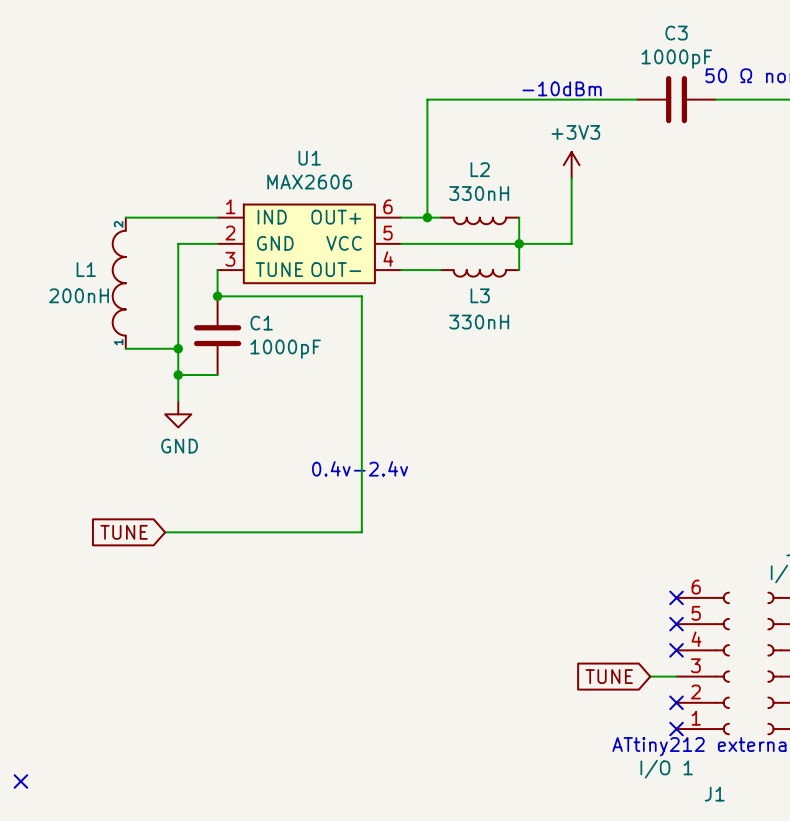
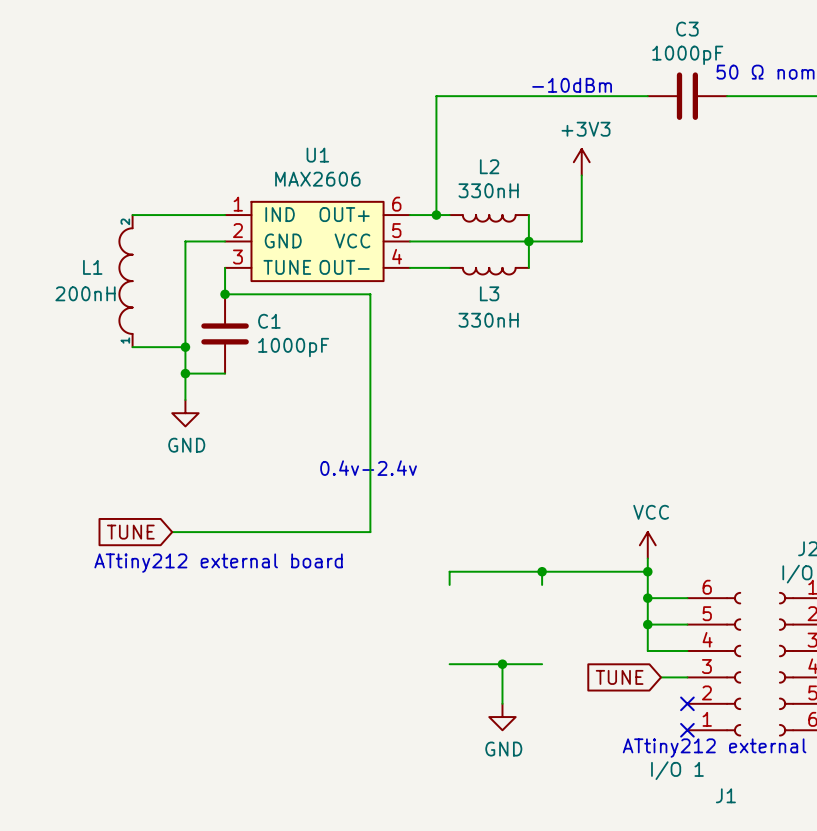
power symbol: none -> VCC (647, 545)
wire: none -> (647, 558) (647, 650) (687, 650)
text: none -> ATtiny212 external board (218, 563)
wire: none -> (542, 571) (542, 584)
junction: none -> (542, 571)
wire: none -> (647, 571) (449, 571) (449, 584)
junction: none -> (647, 571)
wire: none -> (647, 598) (687, 598)
junction: none -> (647, 598)
no-connect mark: (676, 597) -> none
wire: none -> (647, 624) (687, 624)
junction: none -> (647, 624)
no-connect mark: (676, 624) -> none
no-connect mark: (676, 650) -> none
wire: none -> (449, 664) (542, 664)
wire: none -> (502, 664) (502, 703)
junction: none -> (502, 664)
power symbol: none -> GND (502, 717)
no-connect mark: (20, 781) -> none

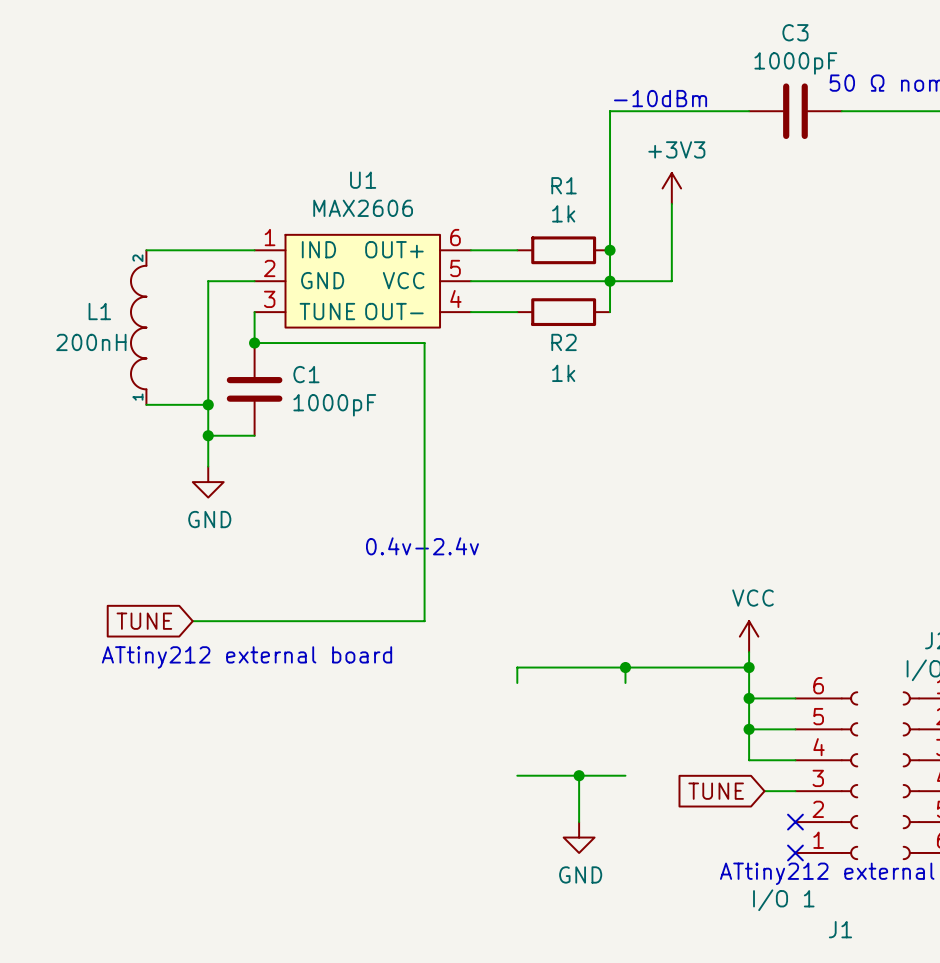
wire: (528, 96) (436, 96) (436, 215) -> (610, 111) (610, 250)
junction: (436, 215) -> none
R1: none -> 1k (563, 250)
junction: none -> (610, 250)
L2: 330nH (489, 218) -> none
R2: none -> 1k (563, 312)
L3: 330nH (489, 271) -> none

